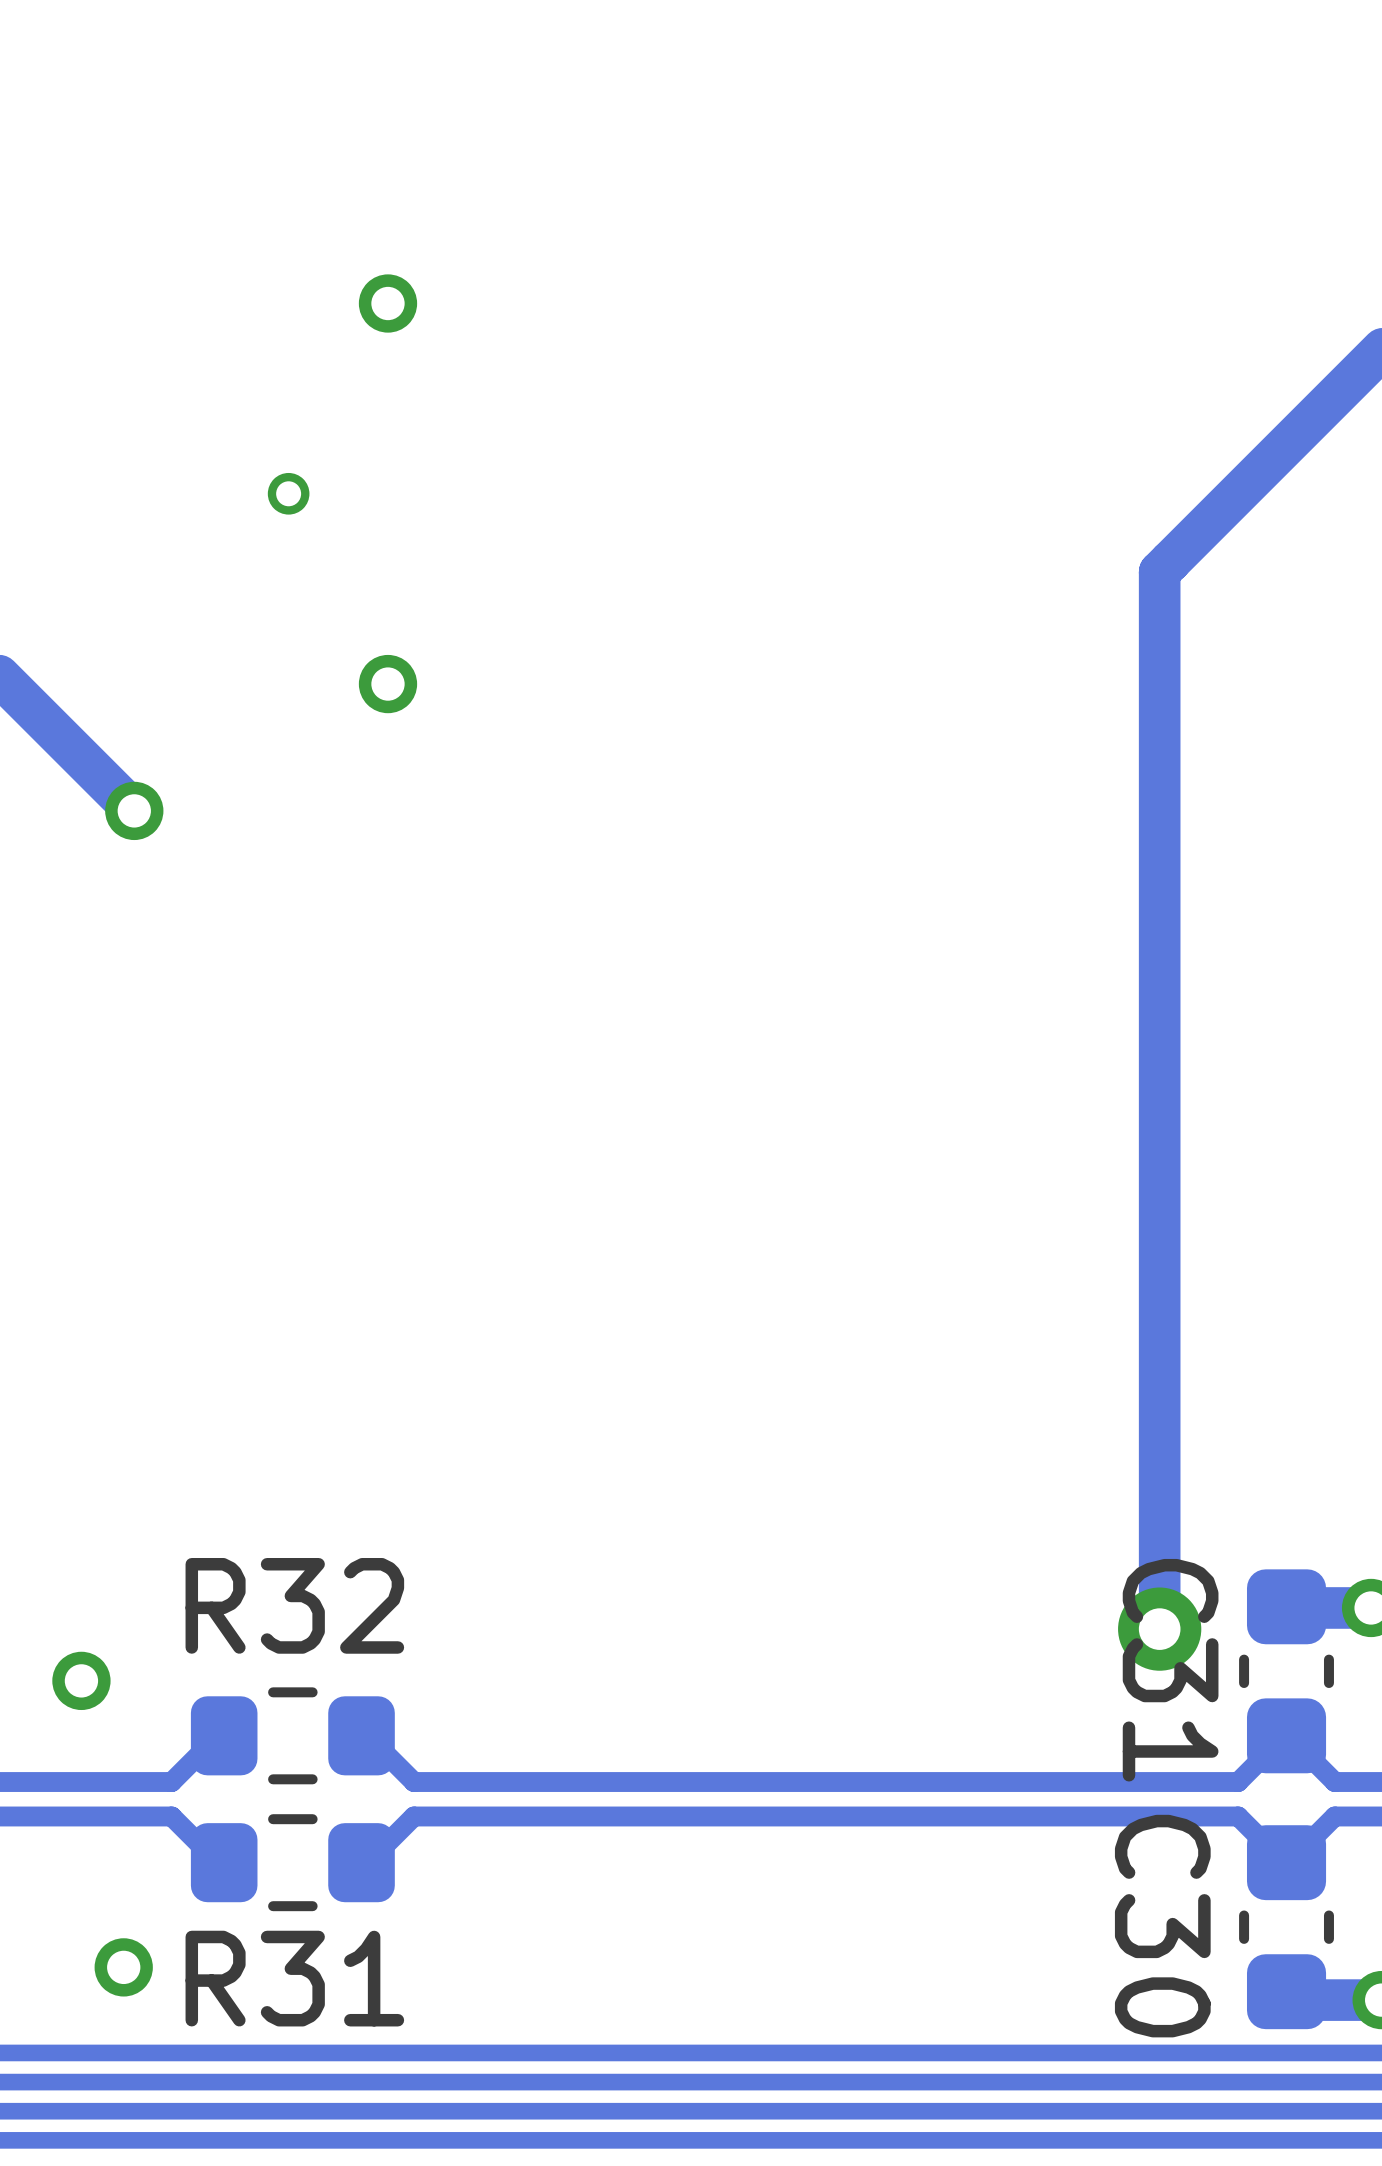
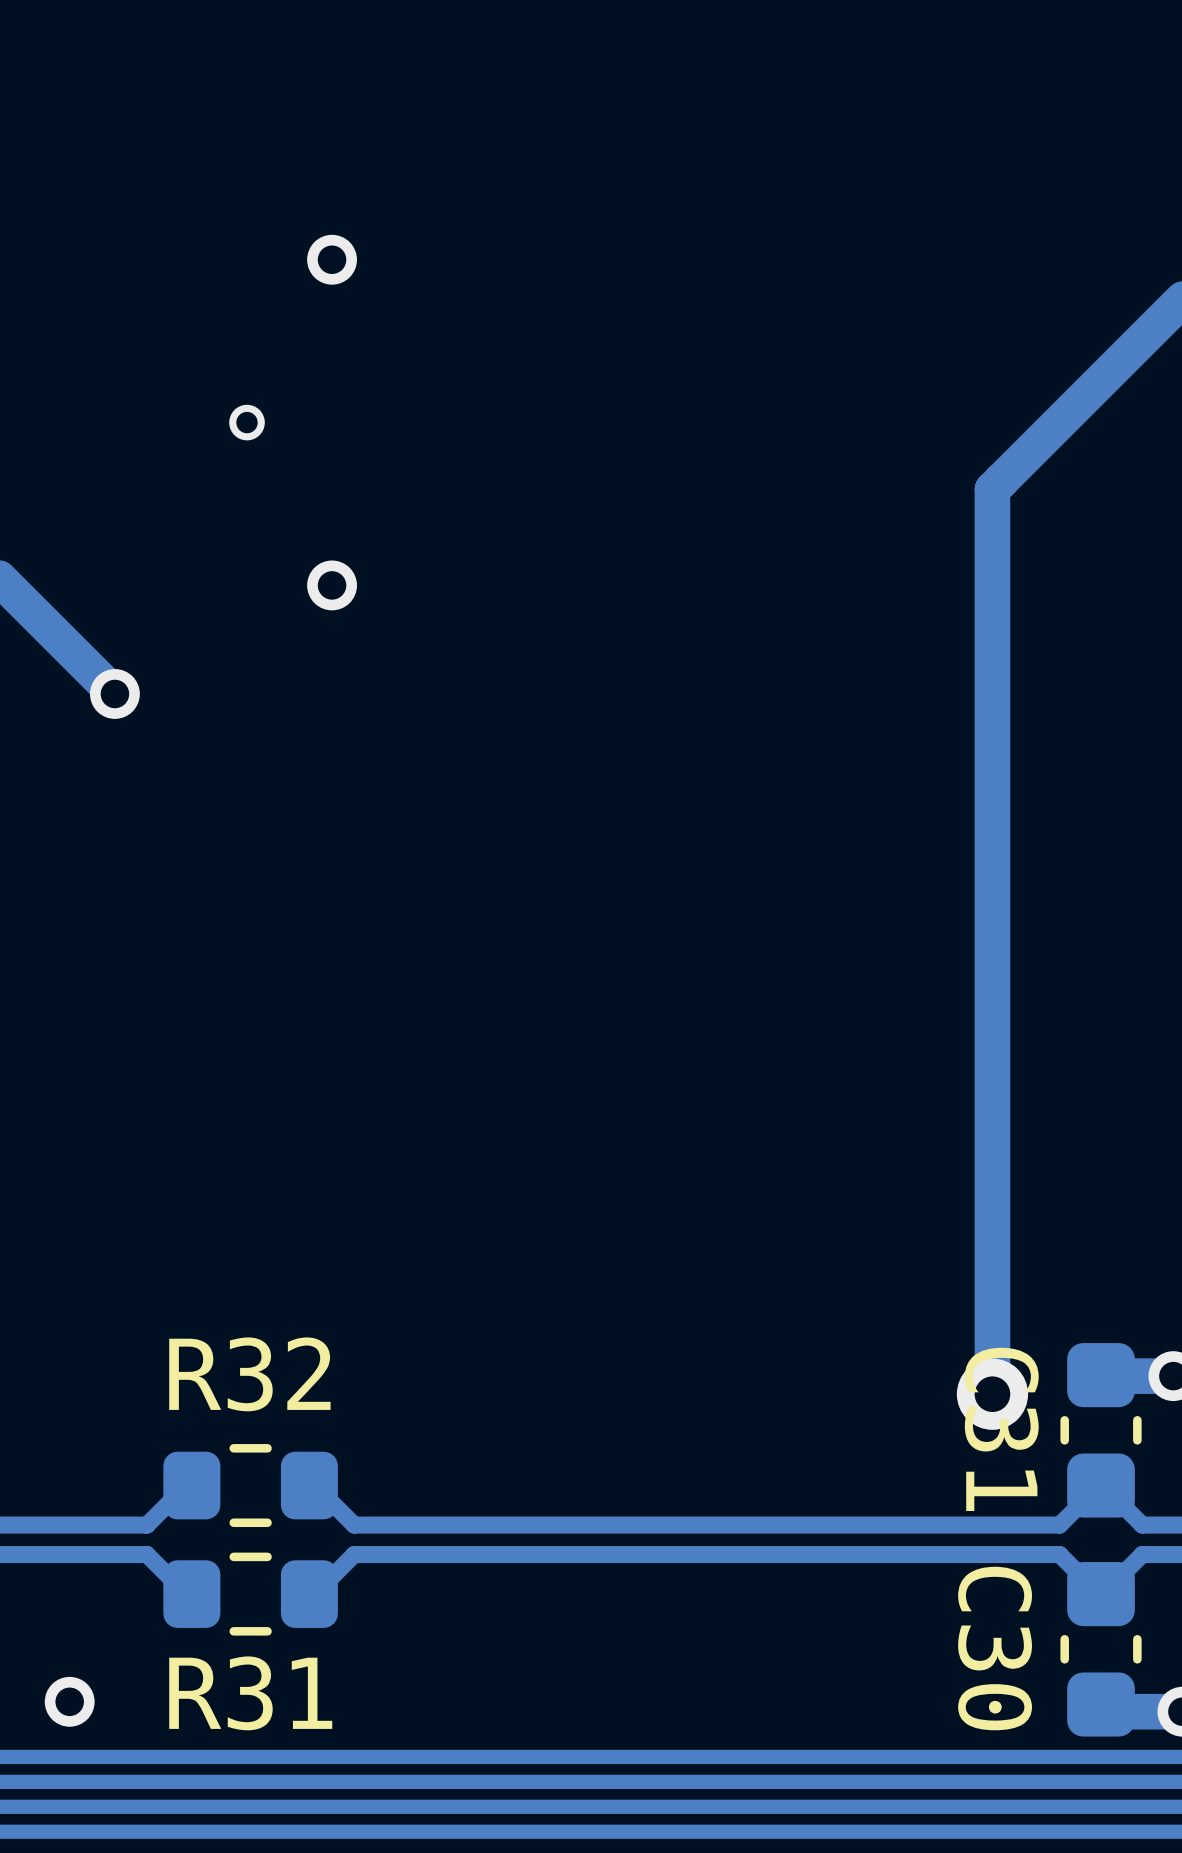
via: (81, 1680) -> none
via position: (123, 1967) -> (69, 1701)

